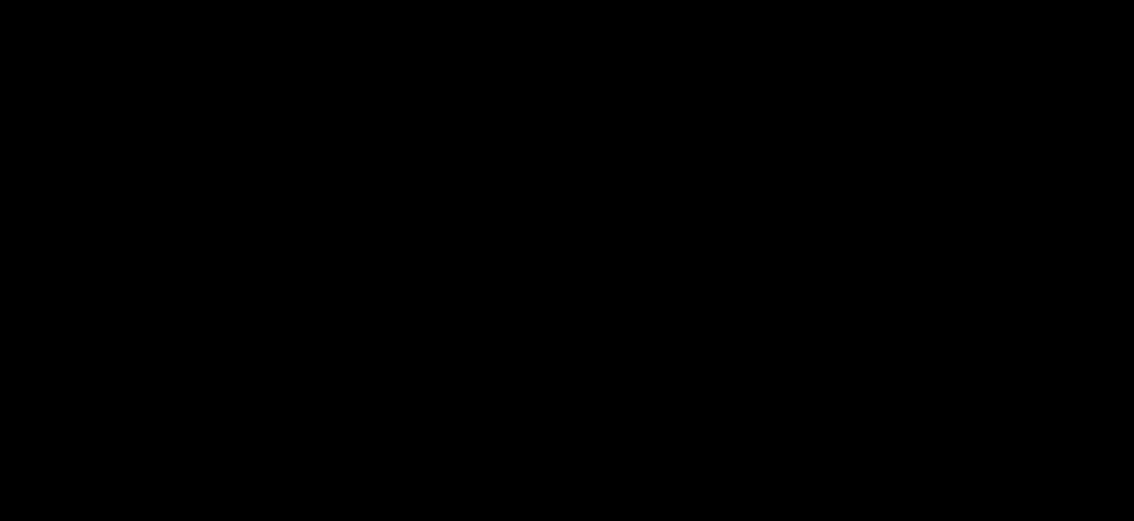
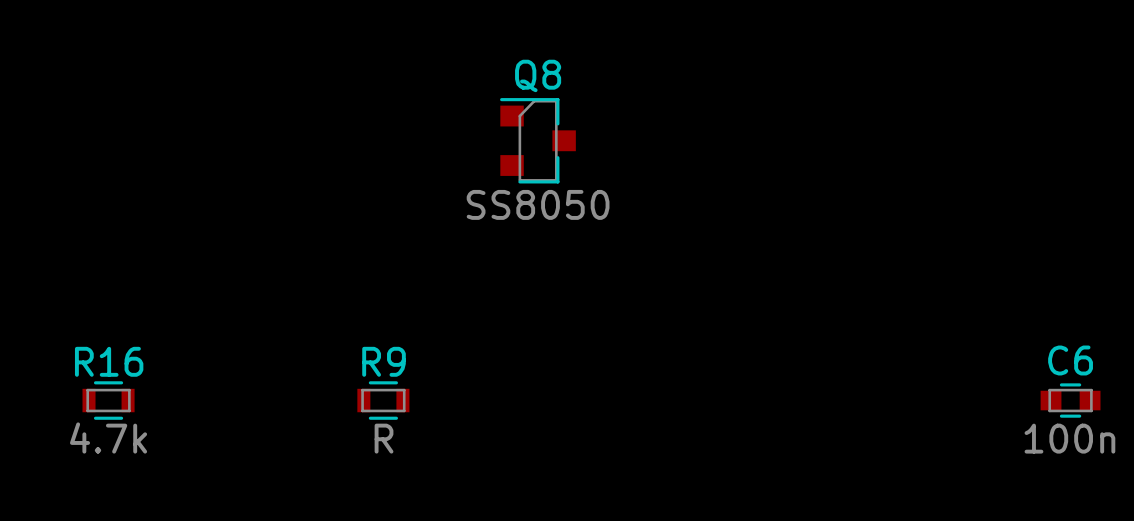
Q8: none -> SS8050 (537, 140)
R16: none -> 4.7k (108, 400)
R9: none -> R (383, 400)
C6: none -> 100n (1070, 400)

